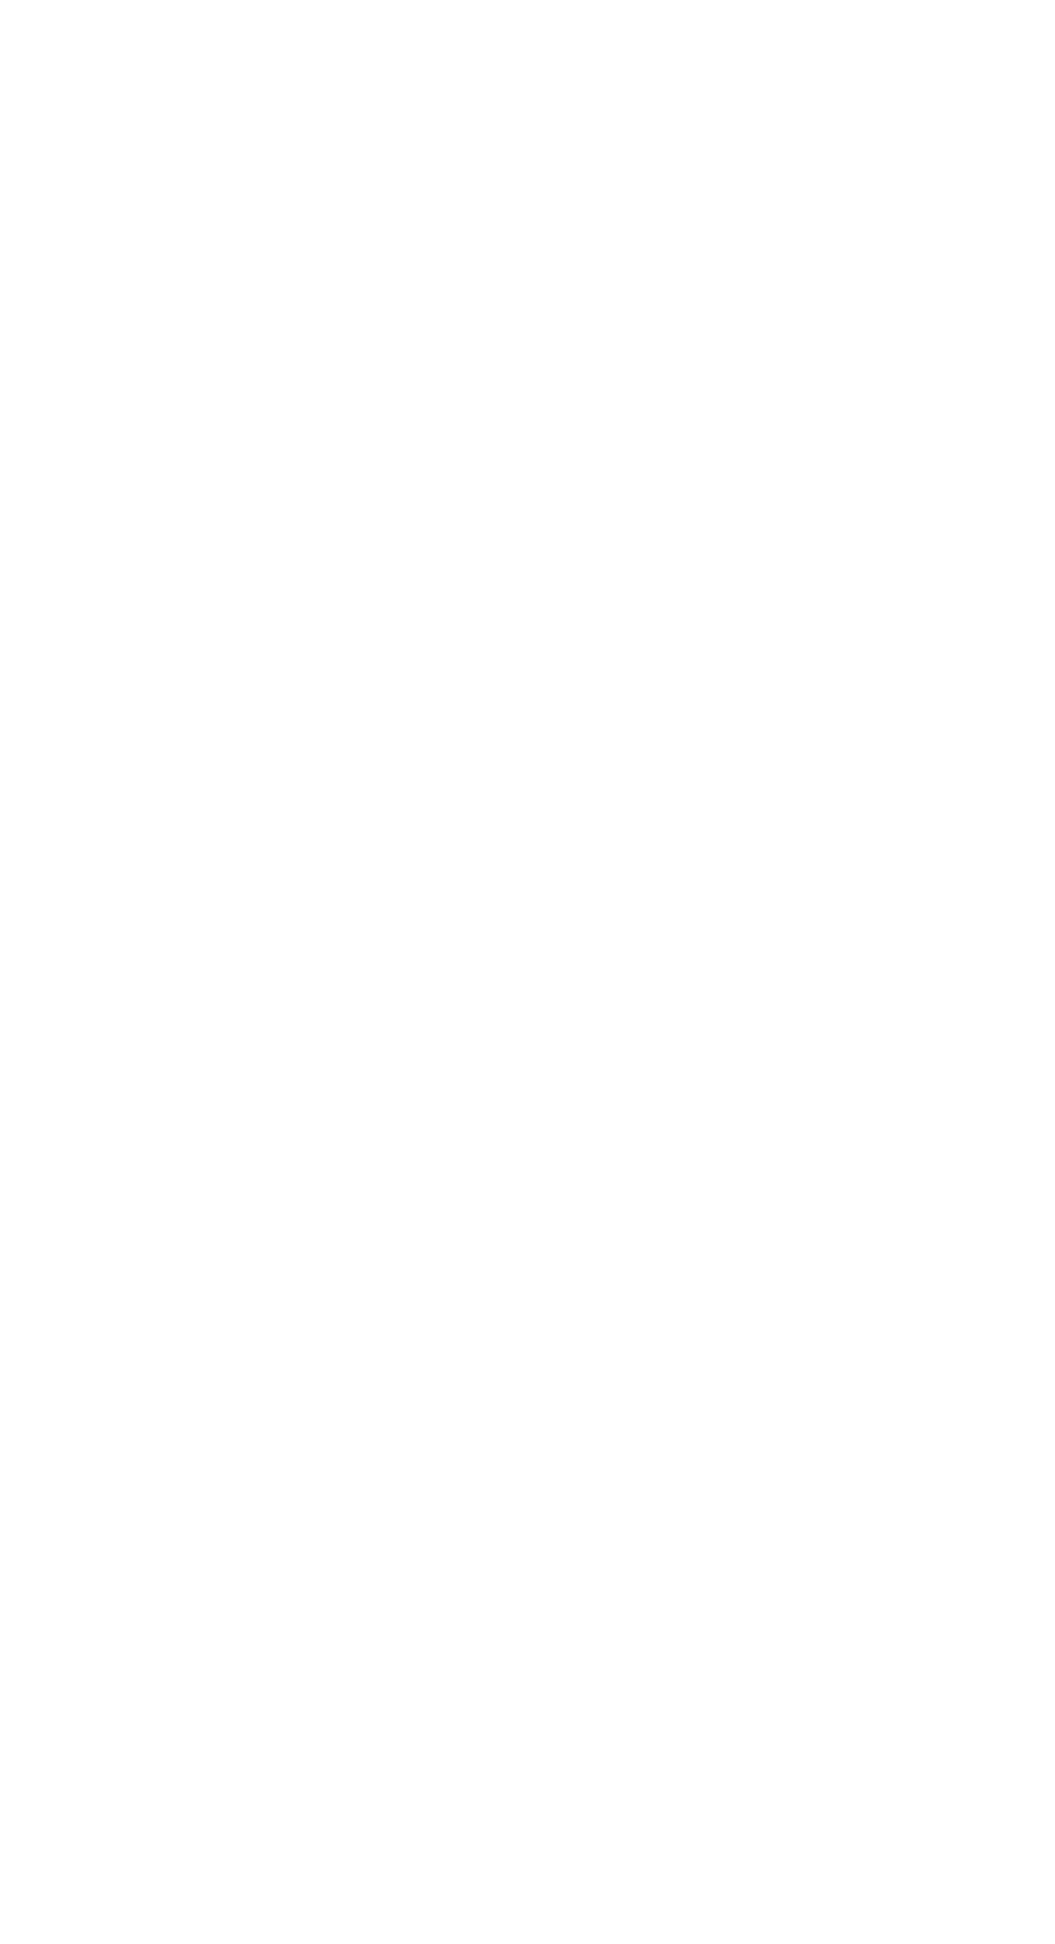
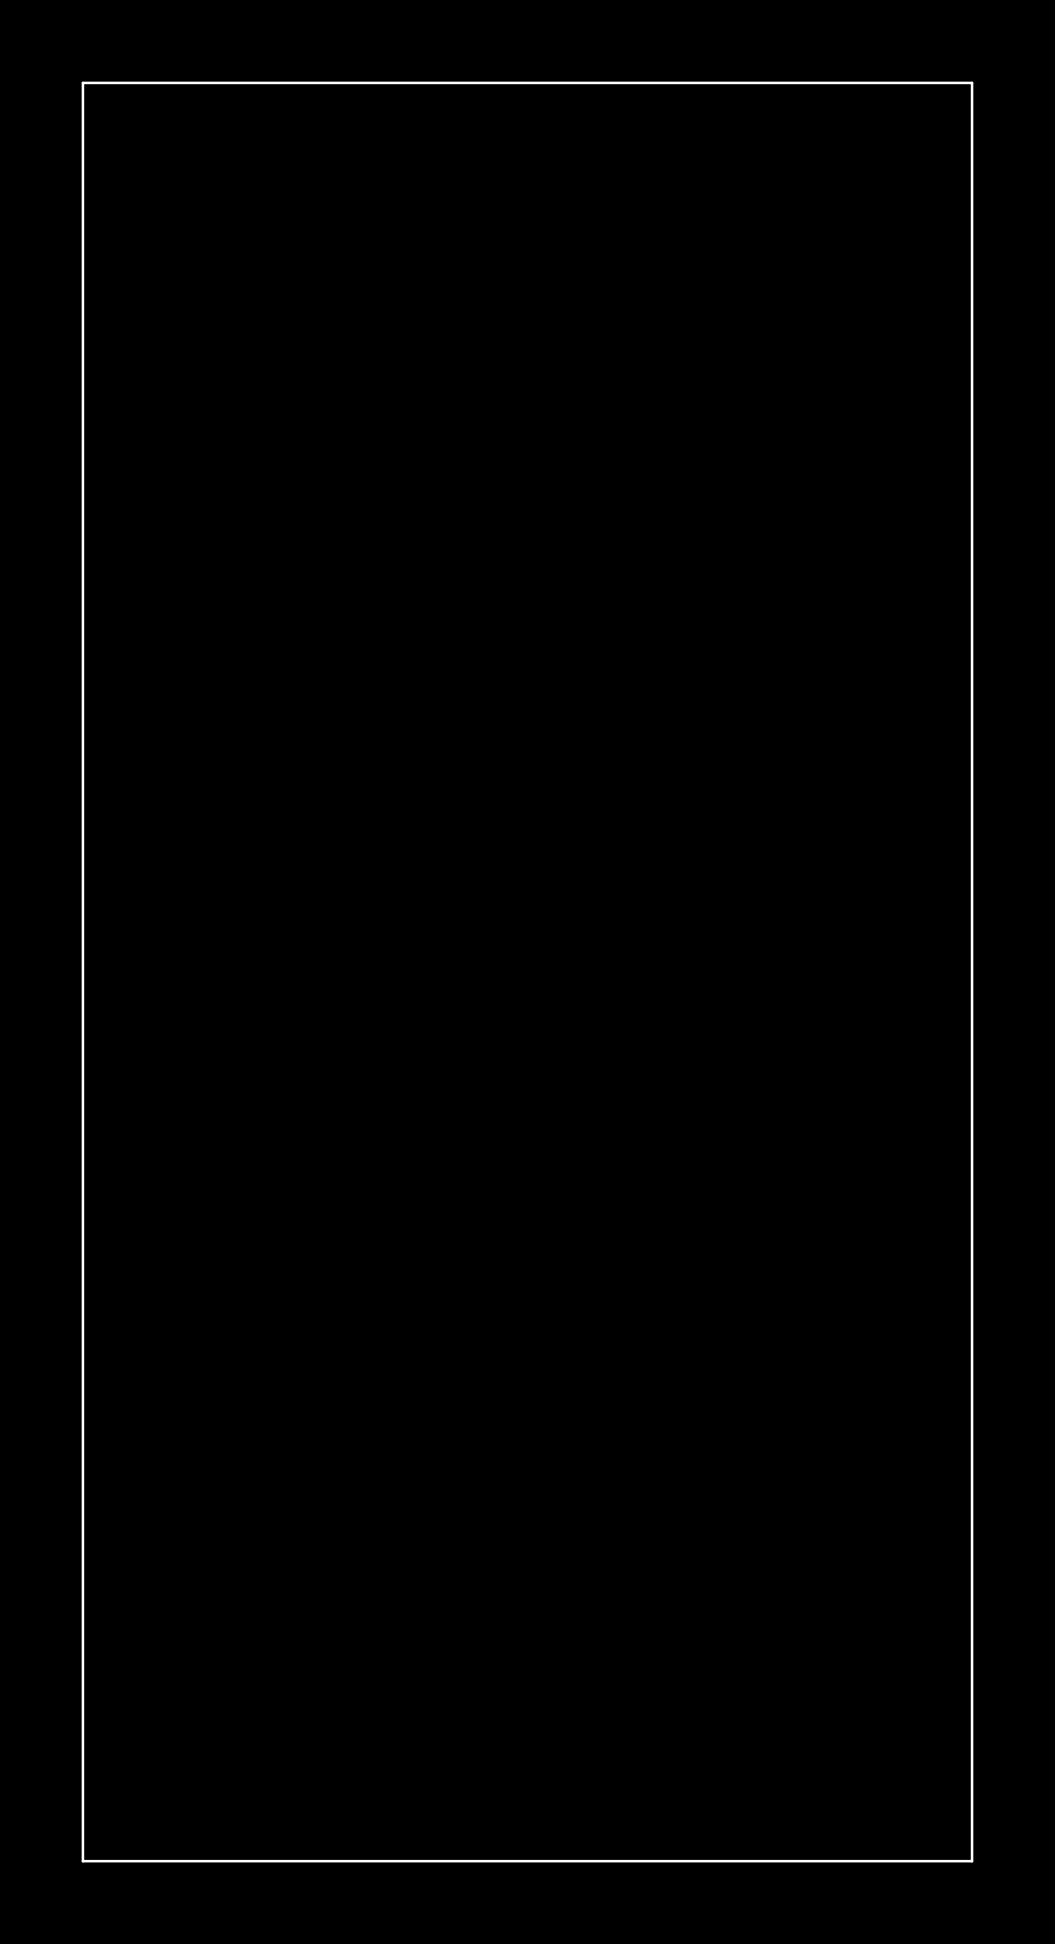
board edge: none -> (972, 82) (82, 82) (82, 1861) (972, 1861) (972, 82)

